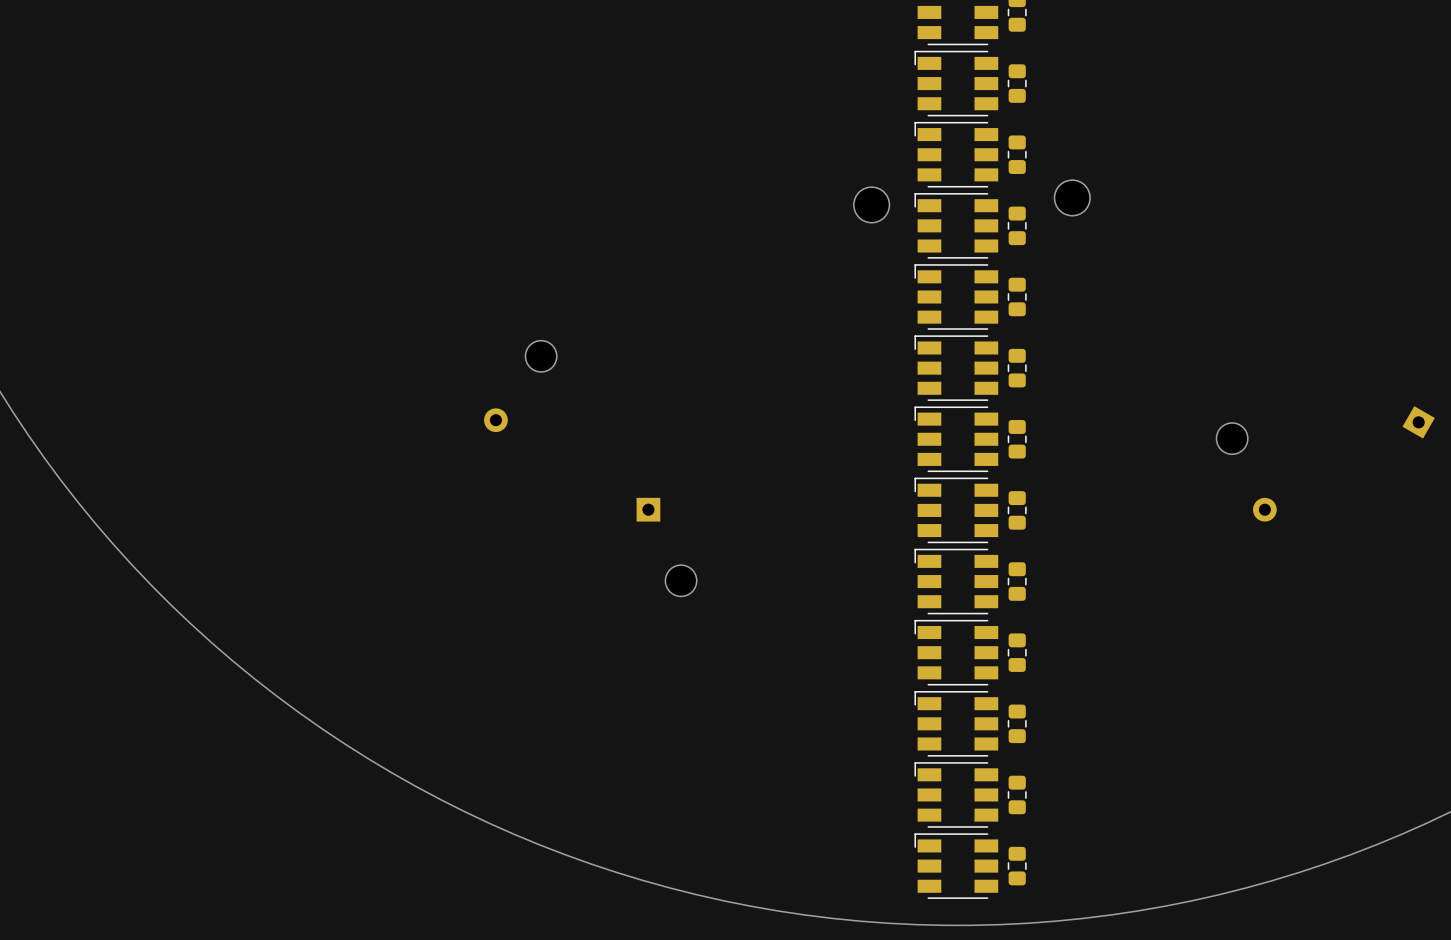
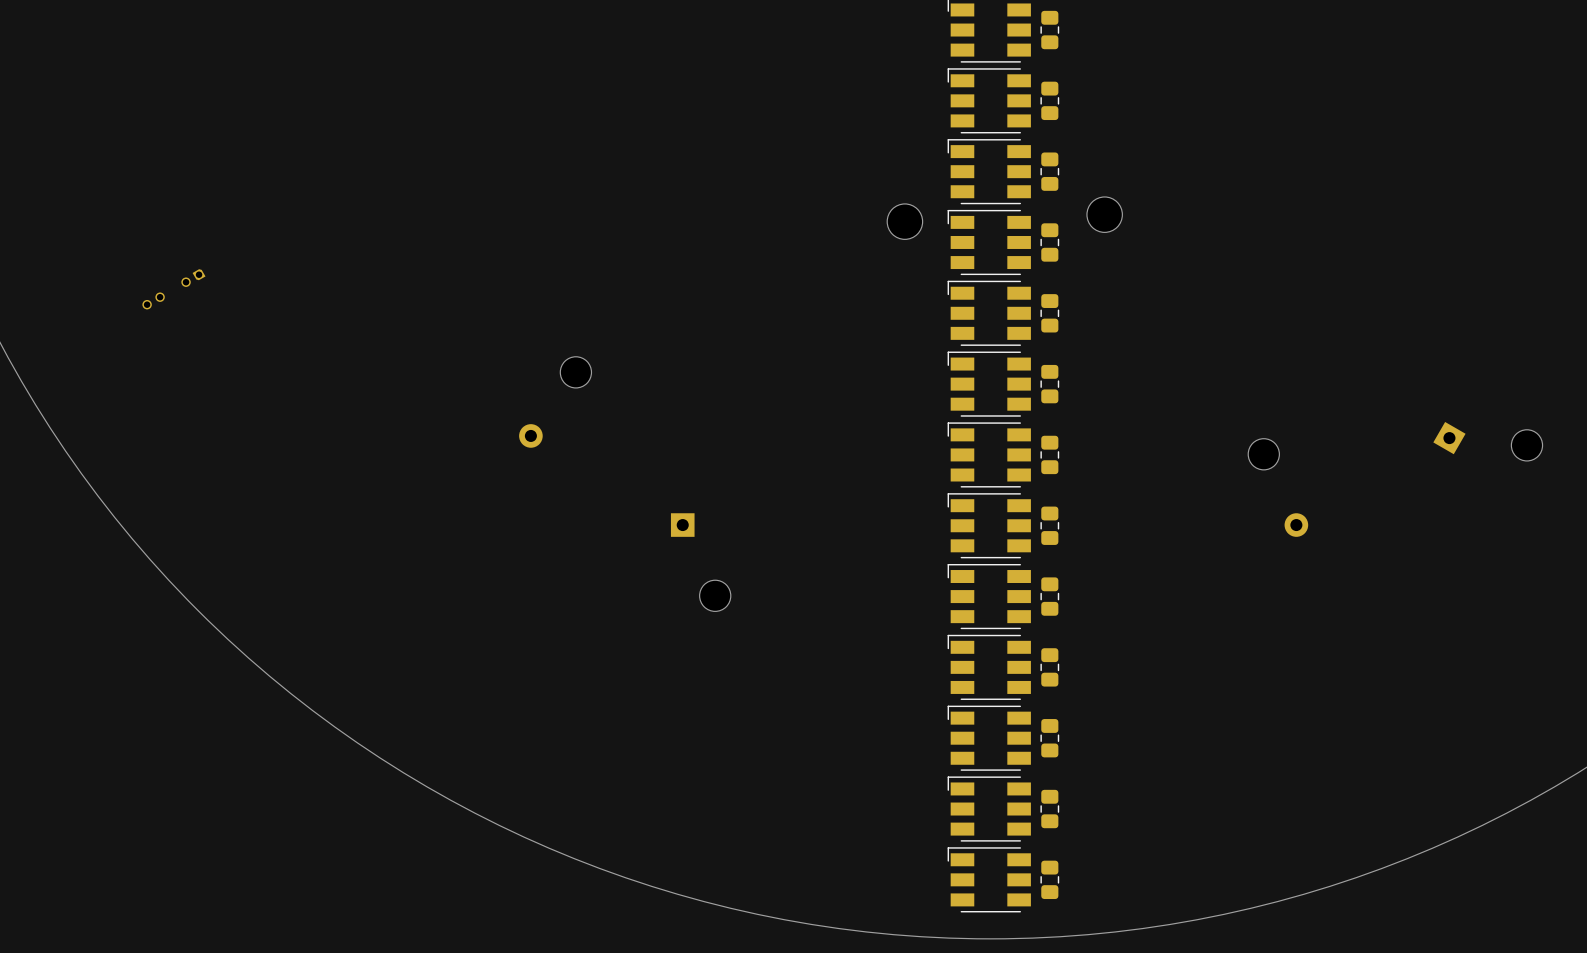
part: none -> (173, 289)

